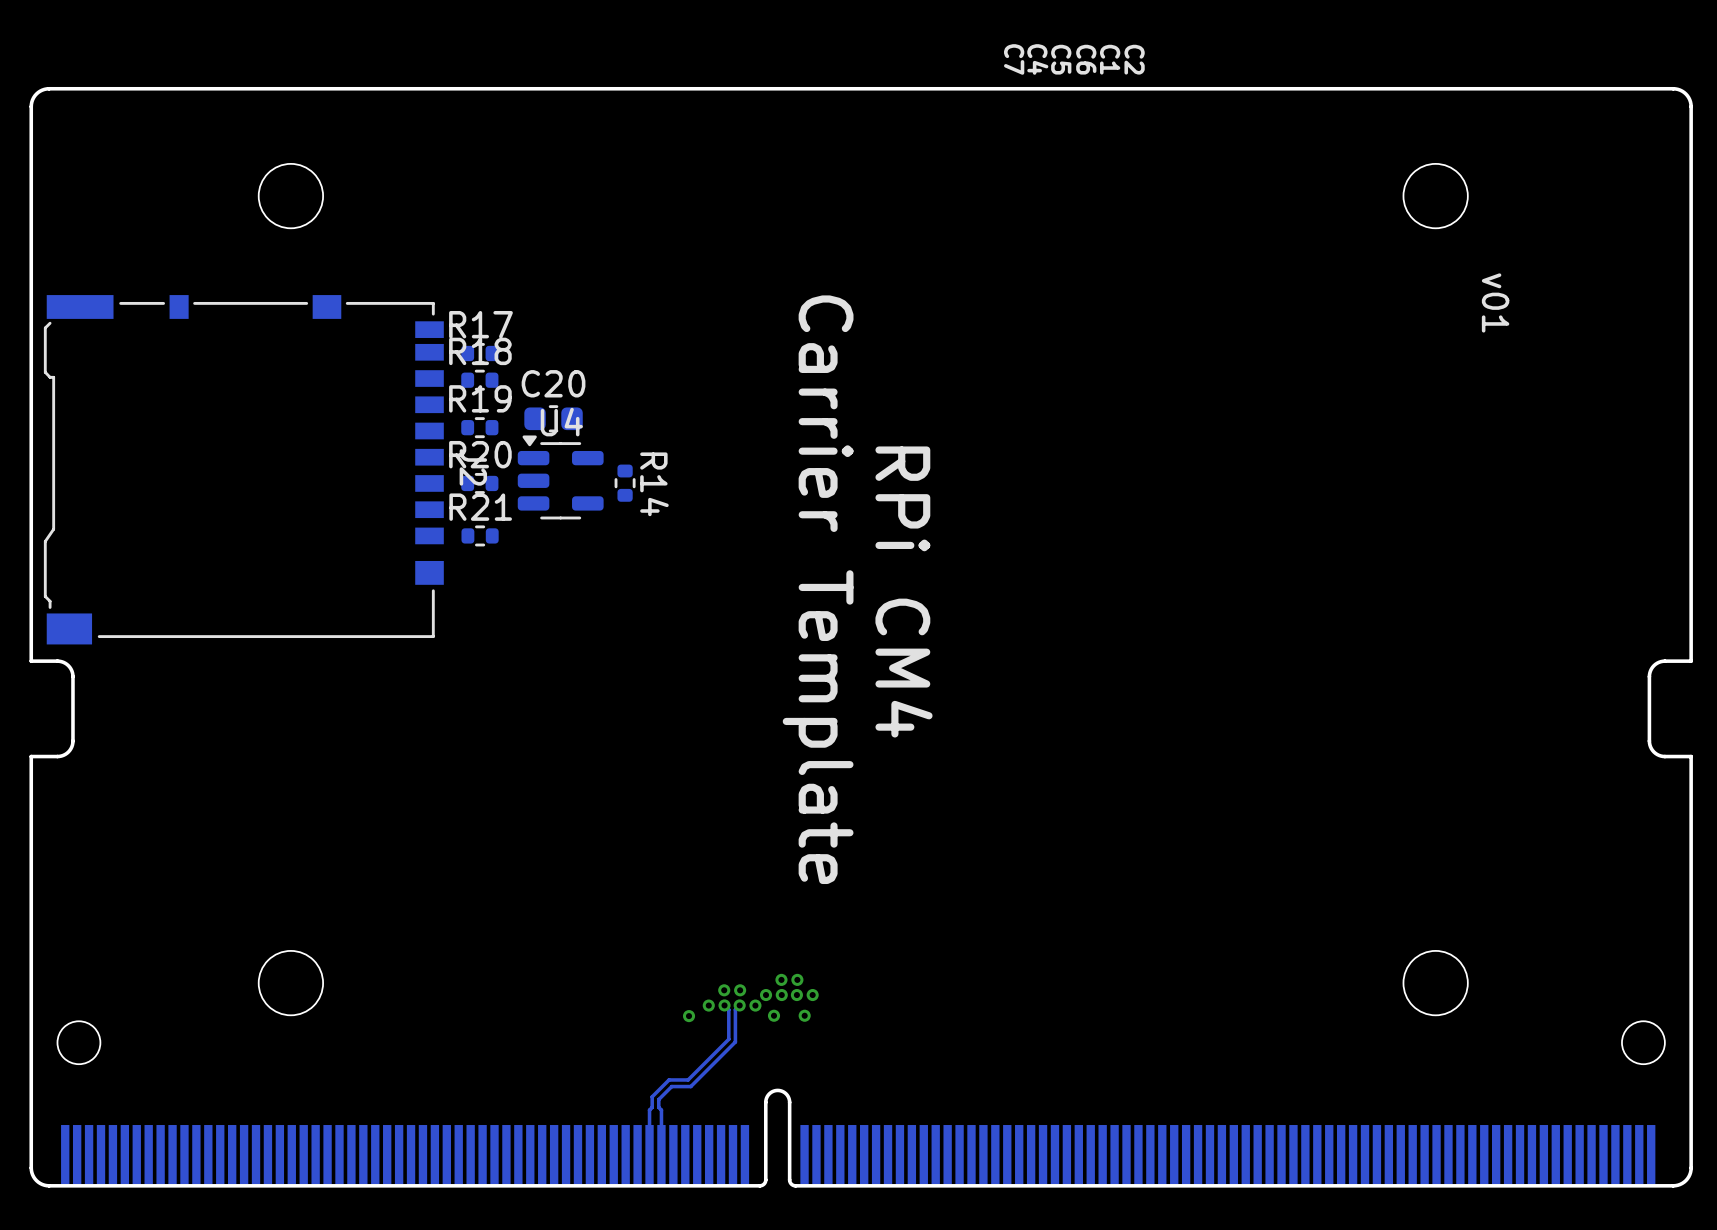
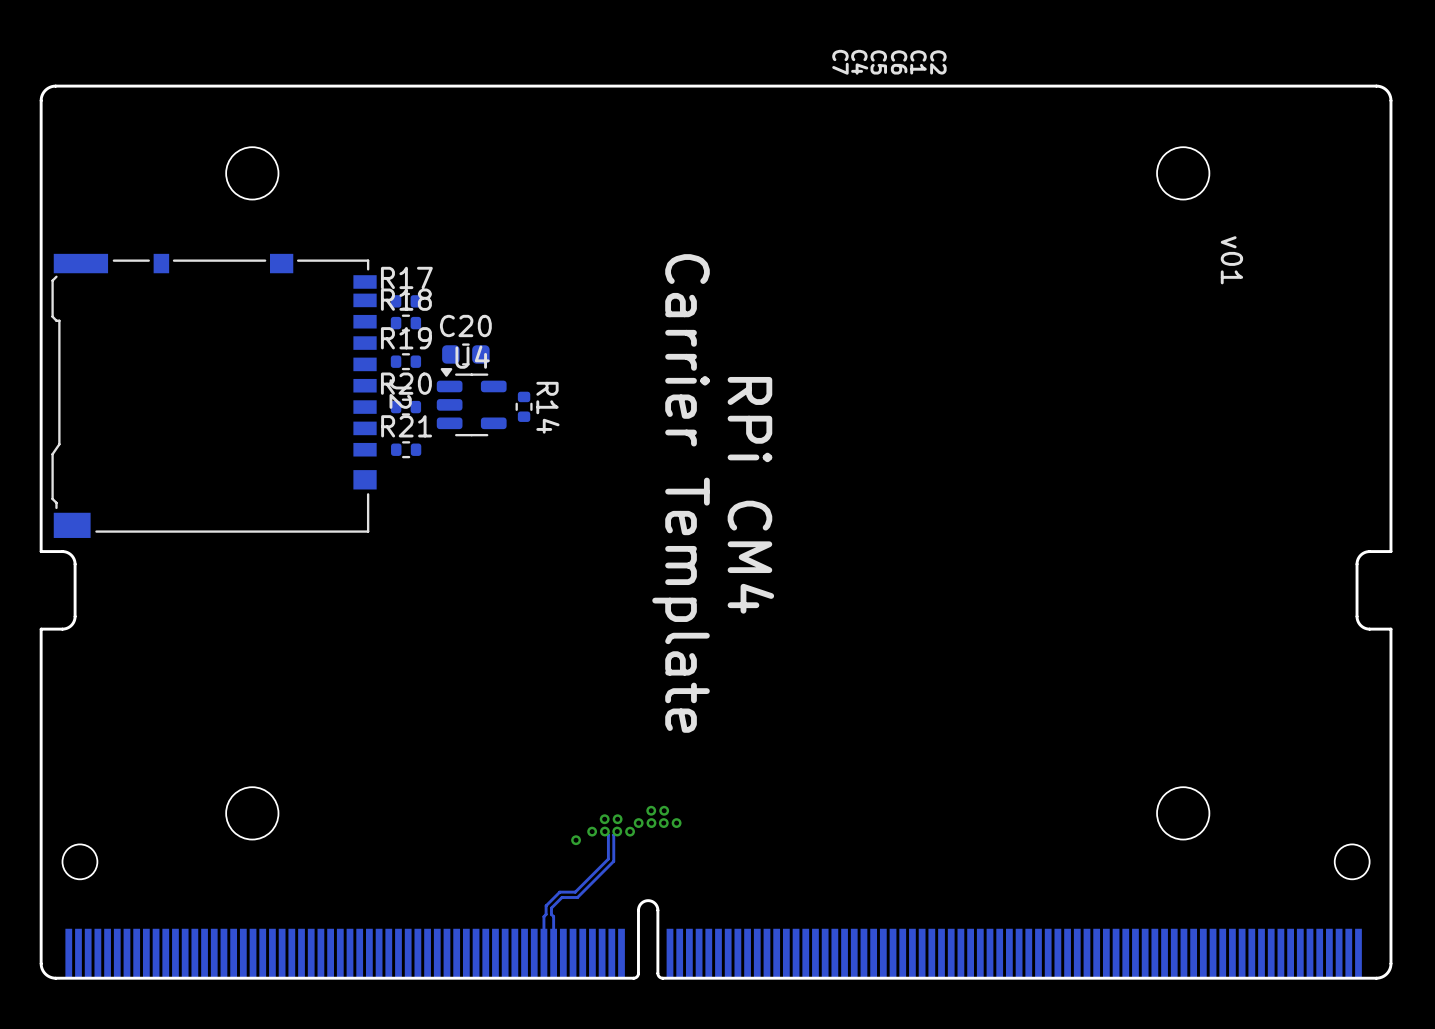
via: (774, 1015) -> none
via: (804, 1015) -> none

